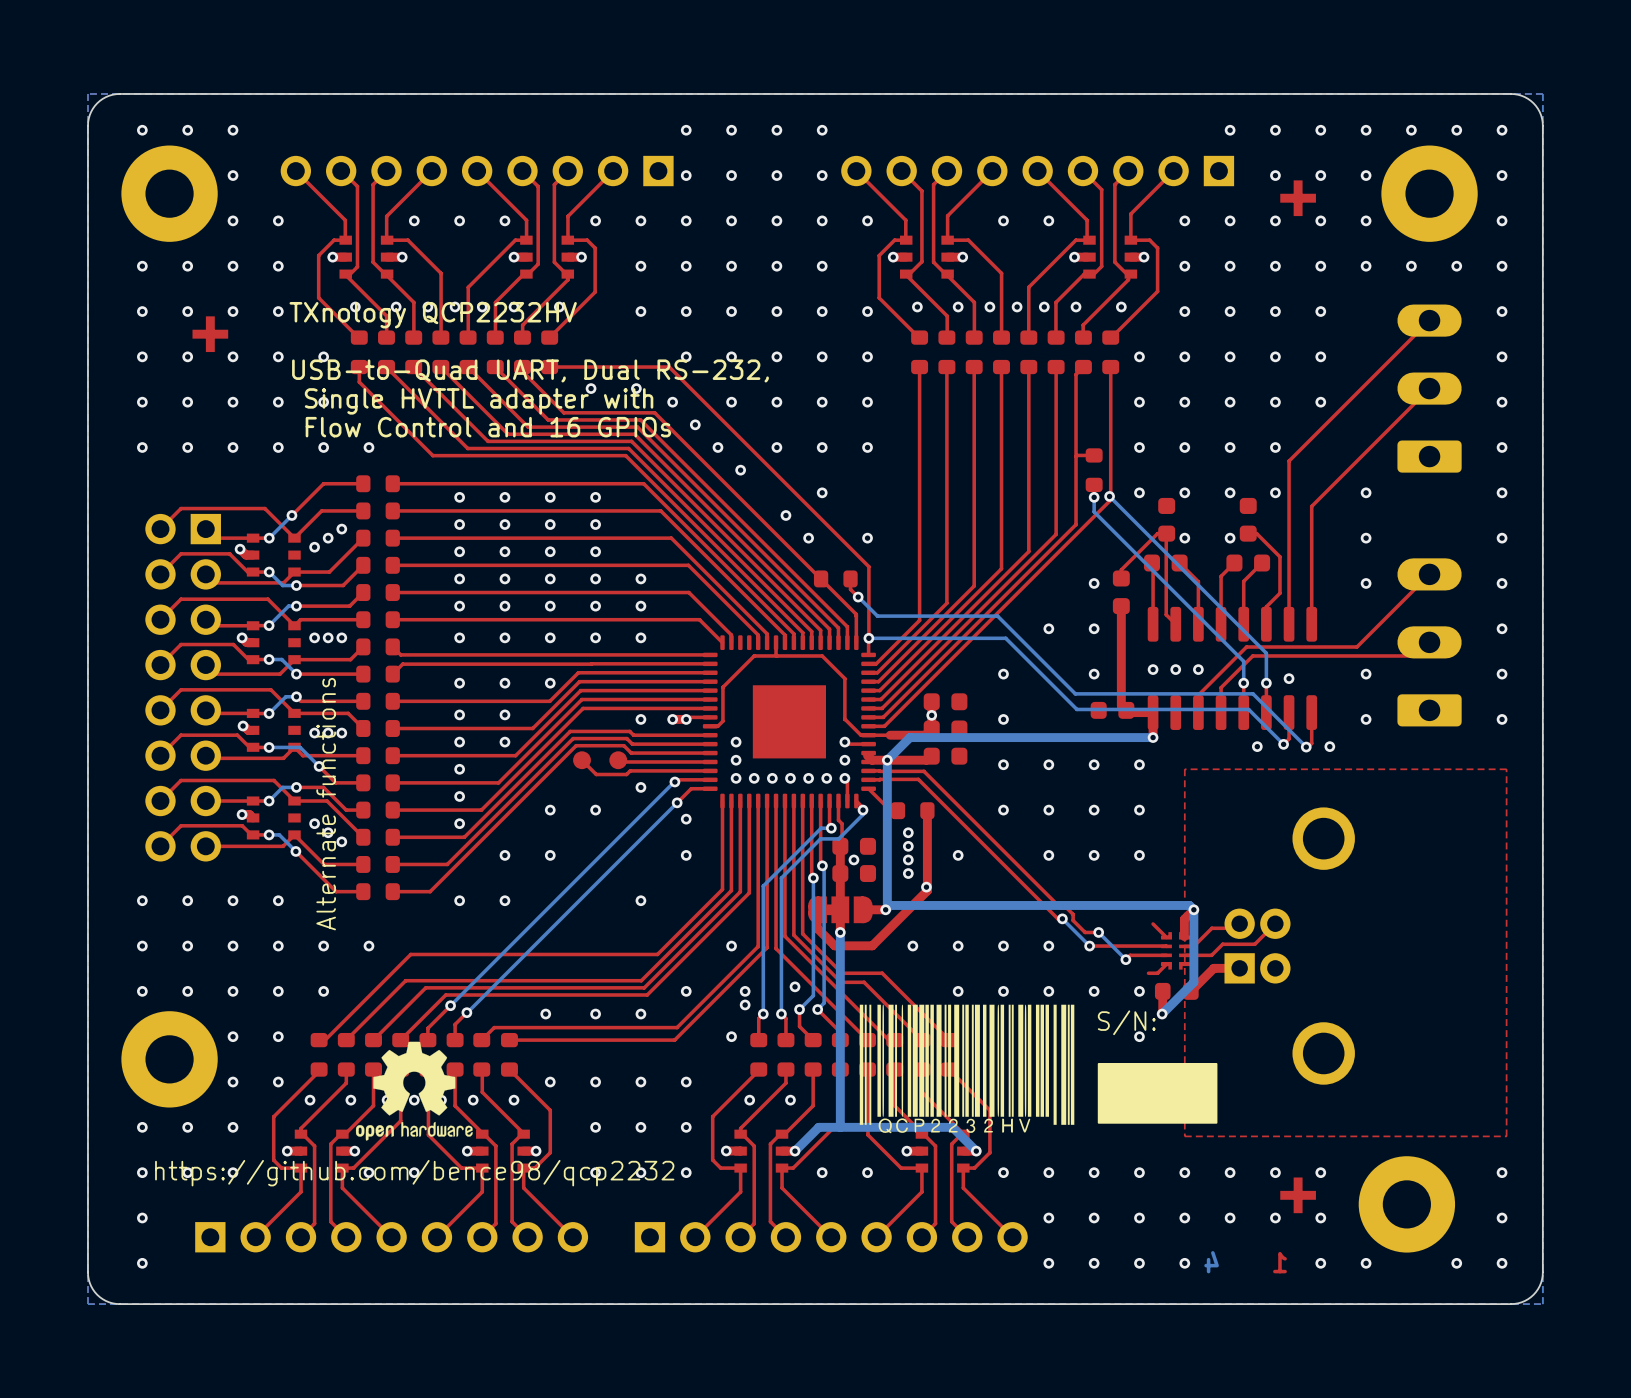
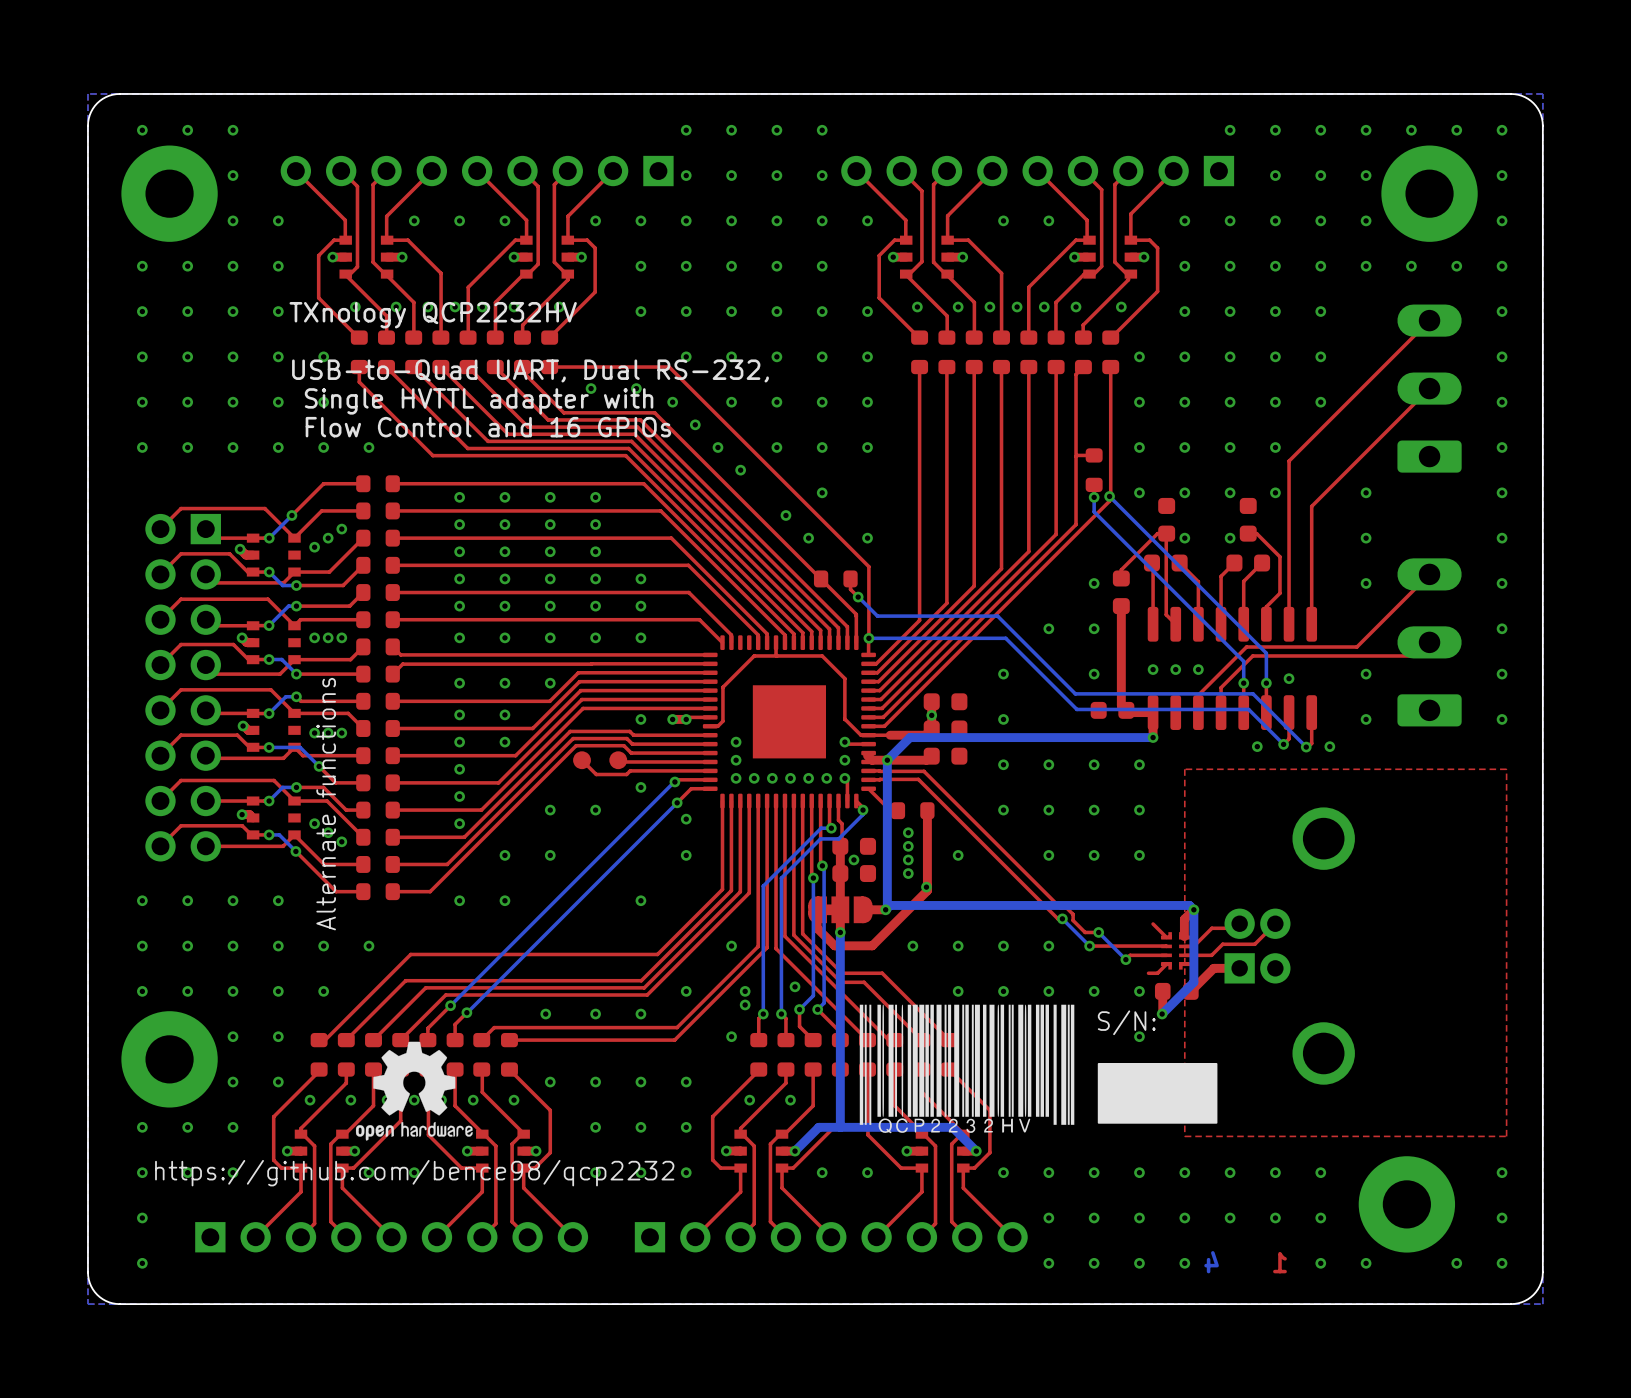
part: (1298, 198) -> none
part: (210, 334) -> none
part: (1298, 1195) -> none

